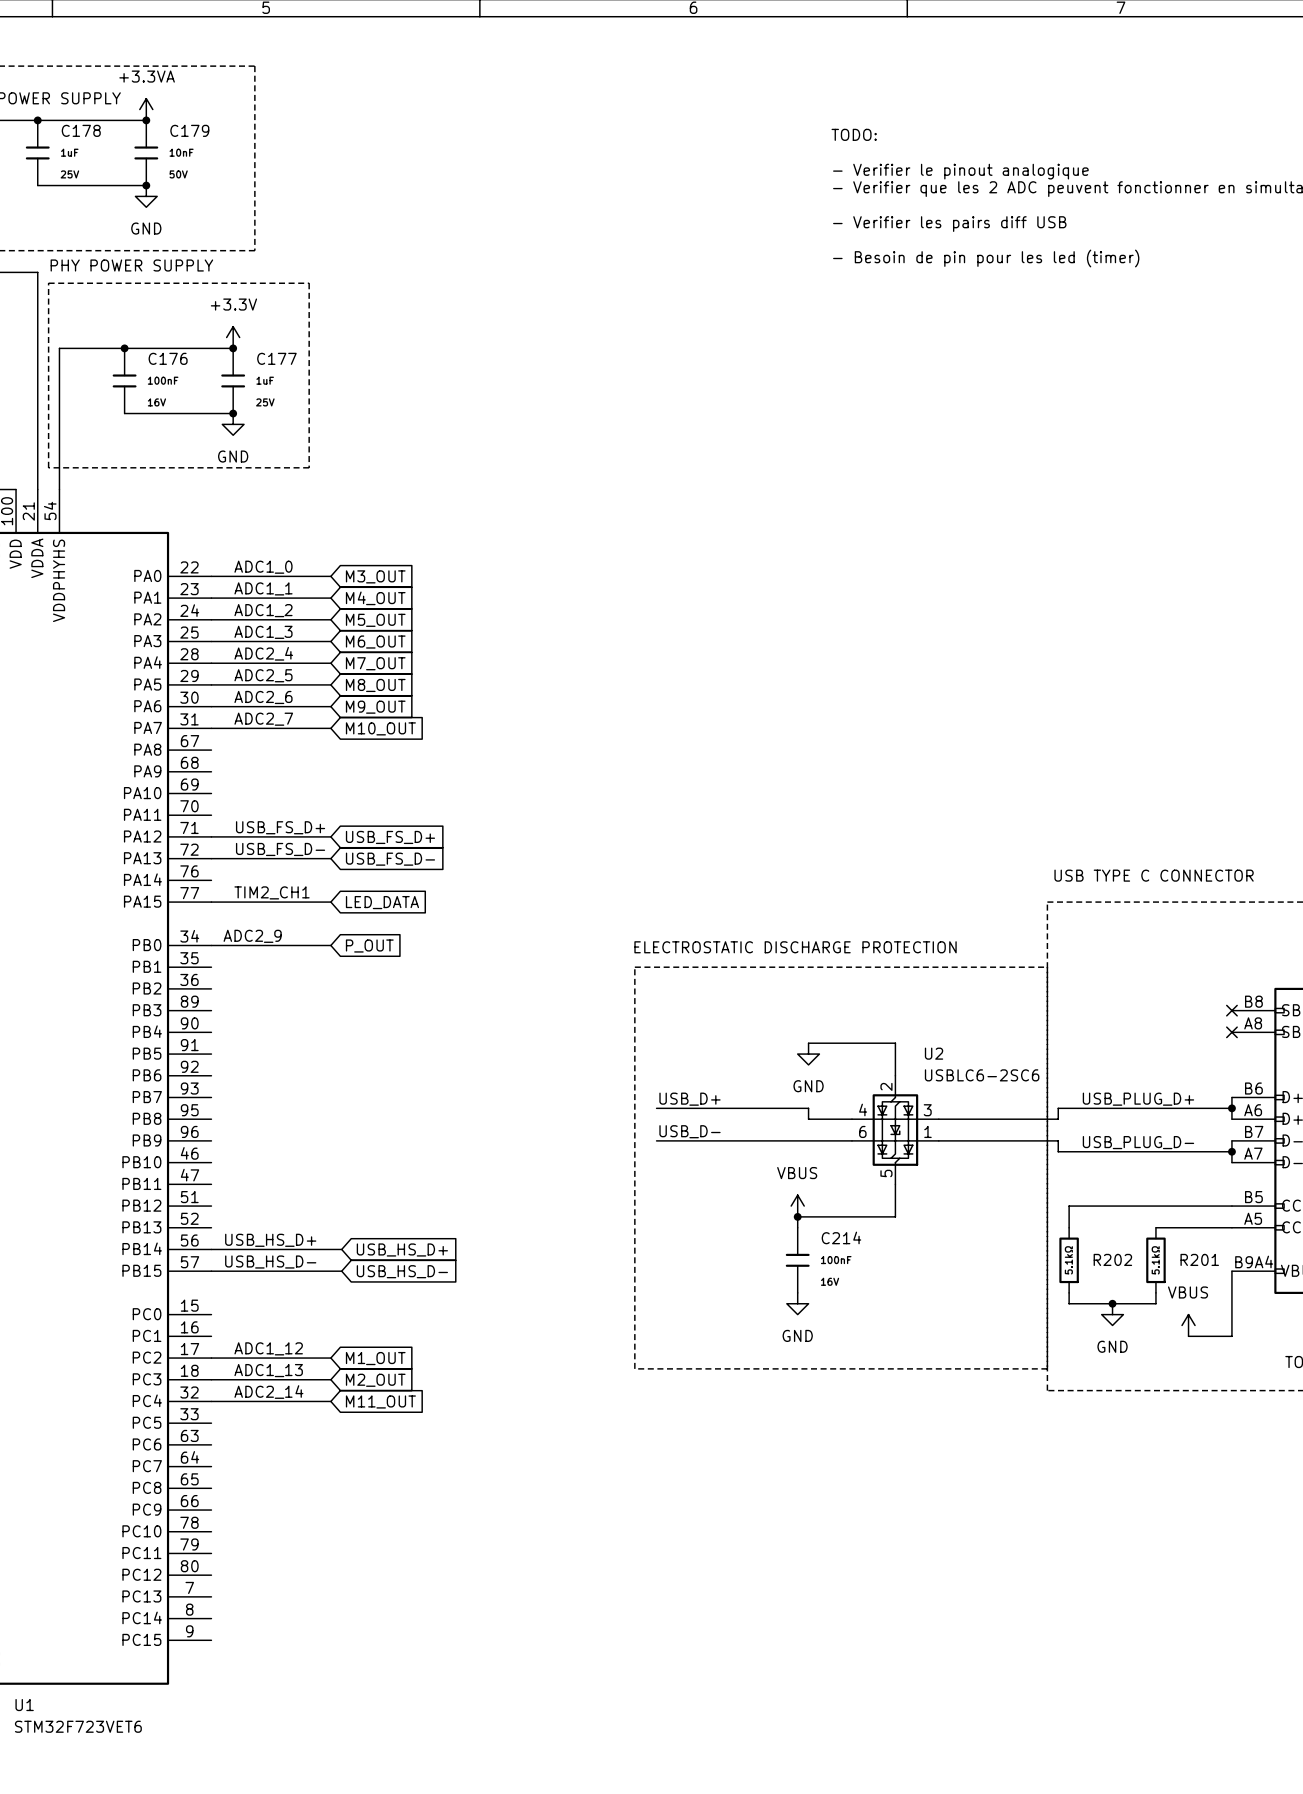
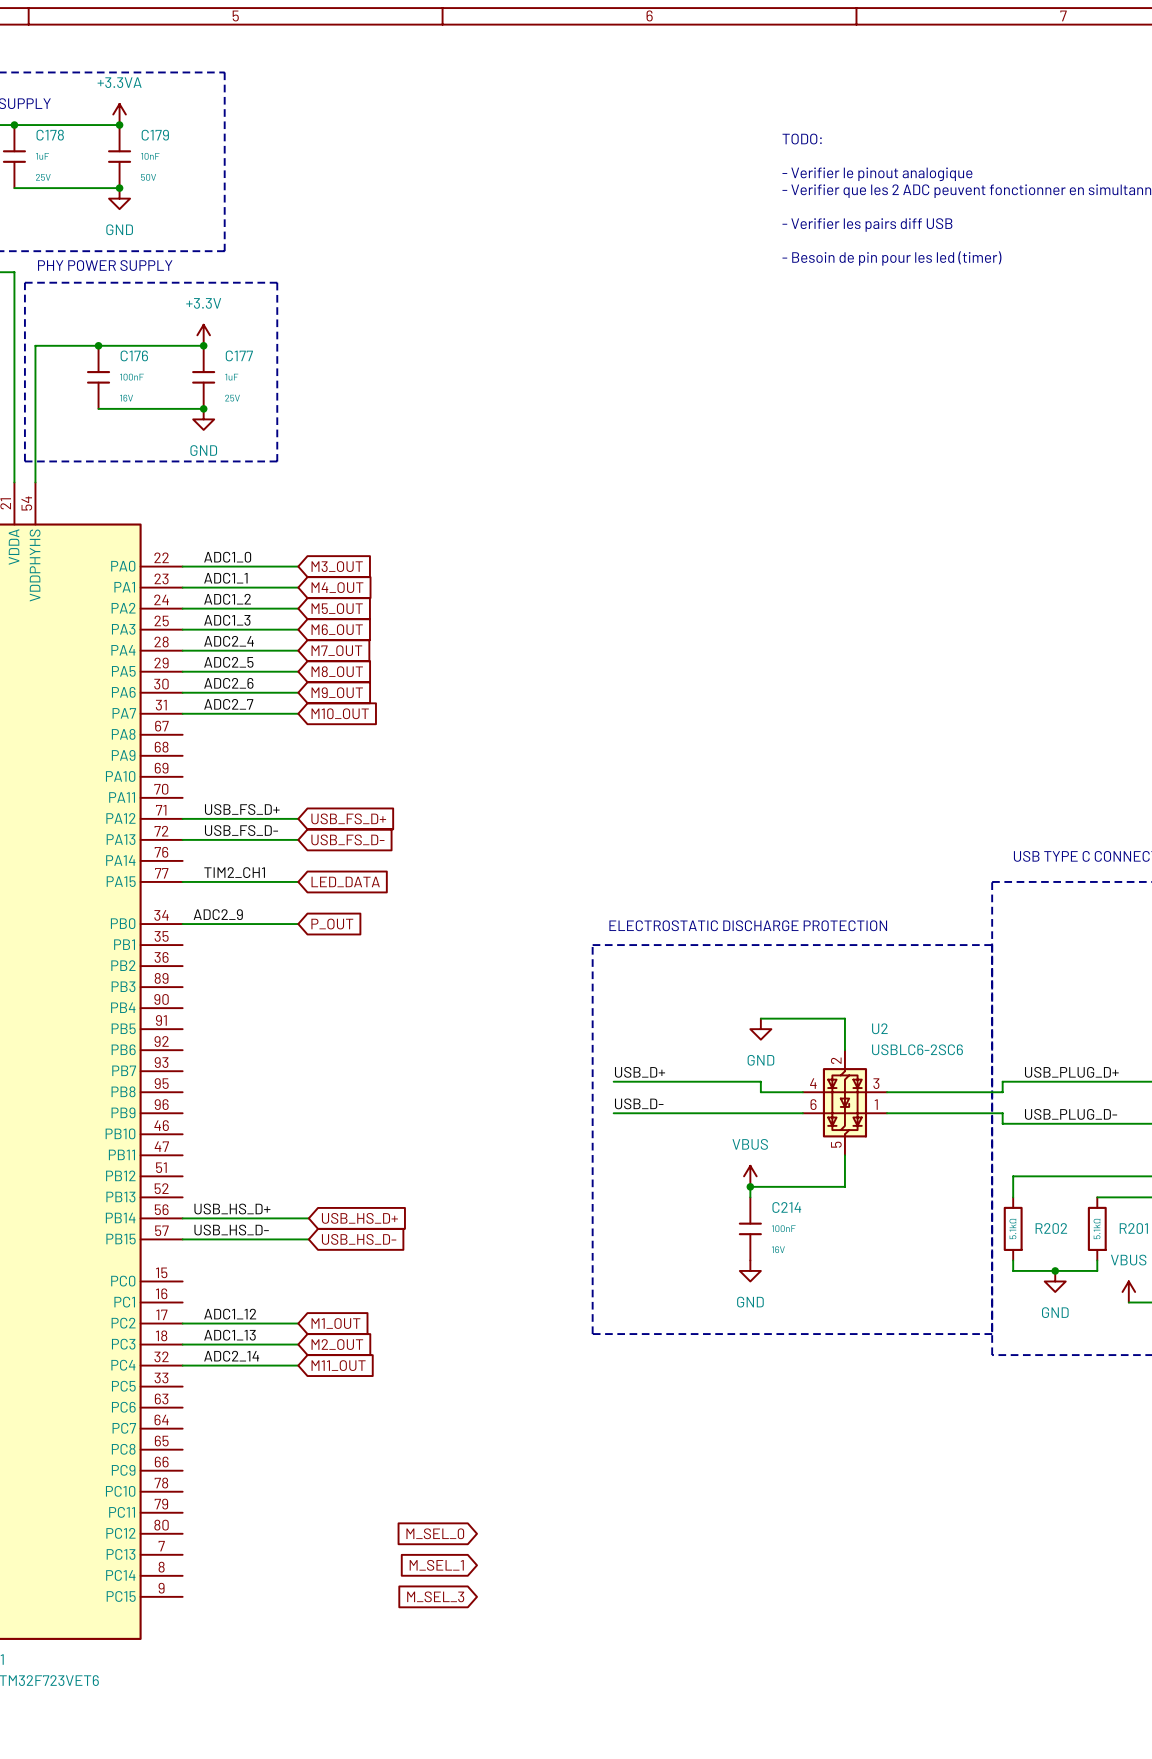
global label: none -> M_SEL_0 (435, 1533)
global label: none -> M_SEL_1 (436, 1565)
global label: none -> M_SEL_3 (435, 1596)

